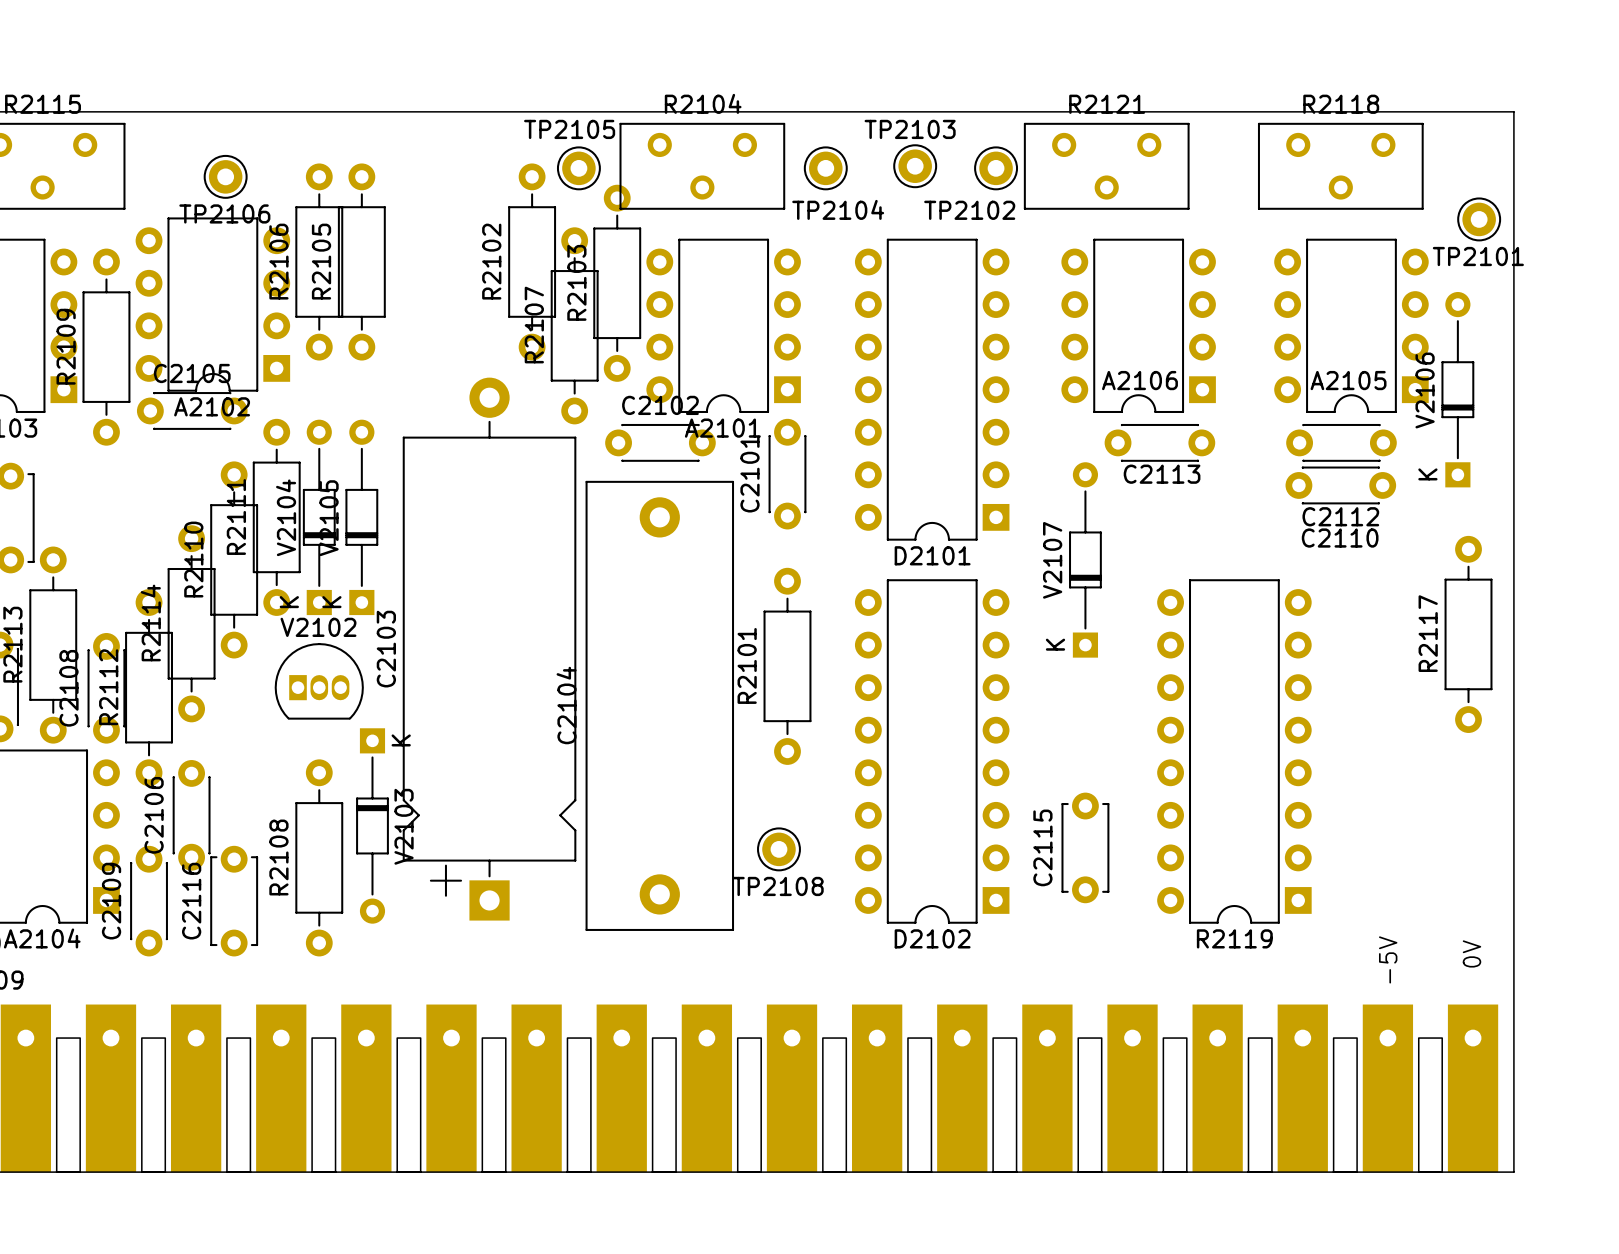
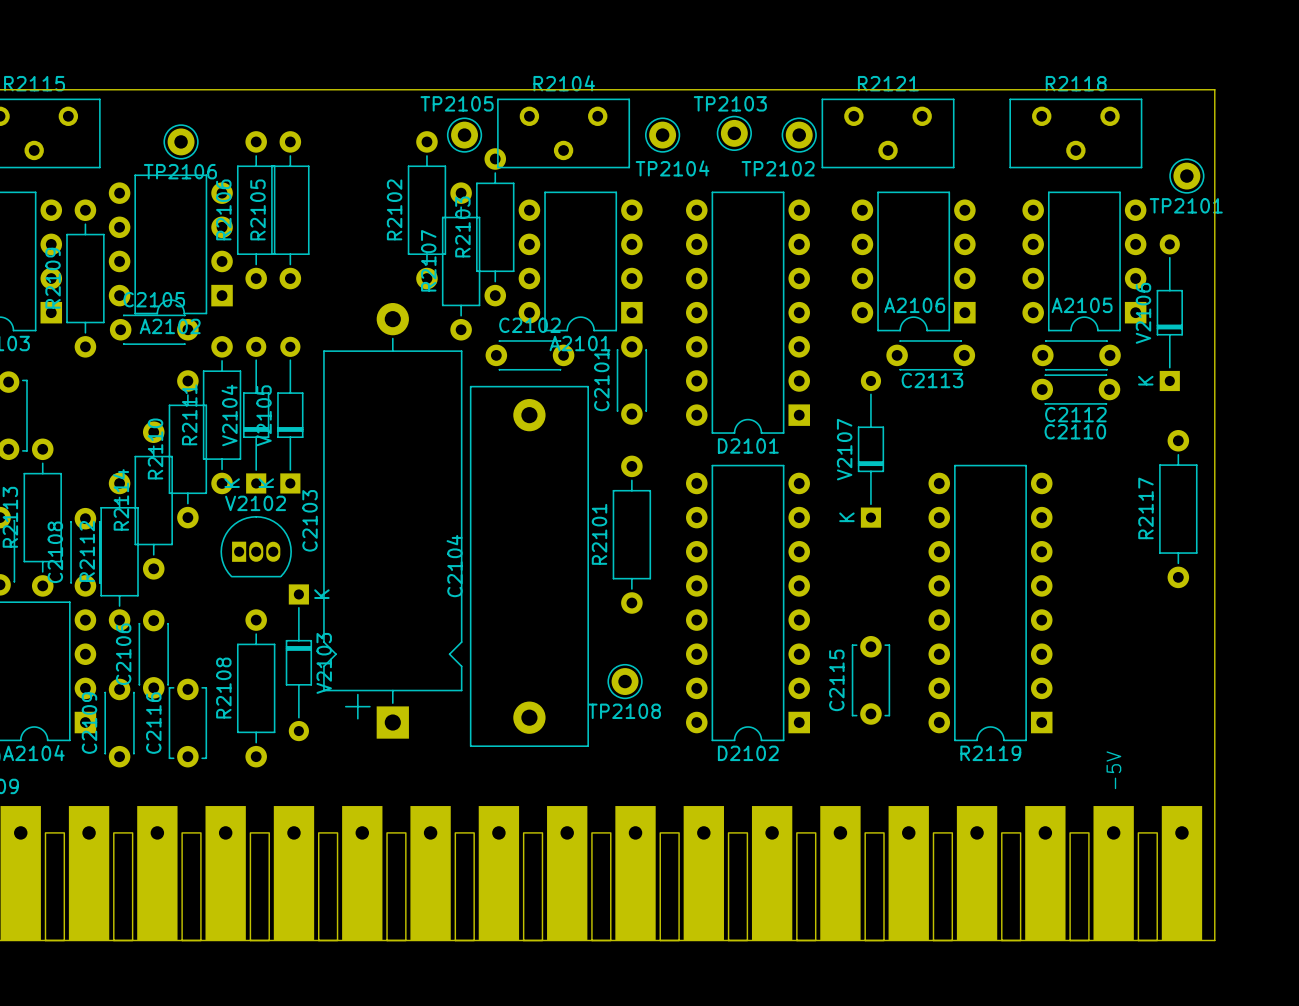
part text: 0V (1471, 953) -> none

